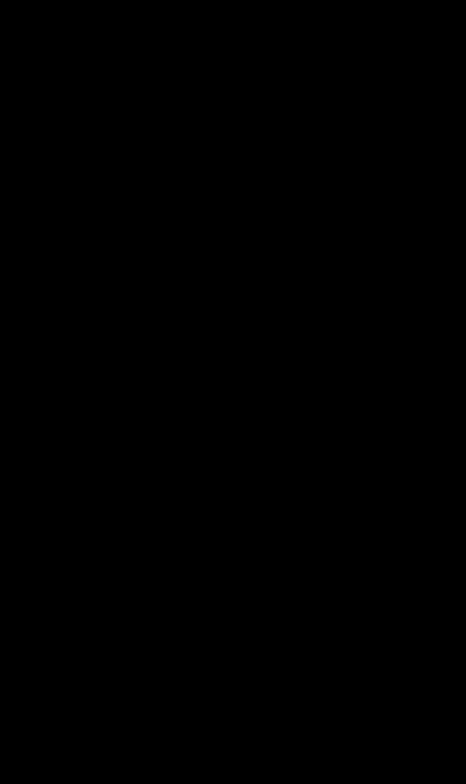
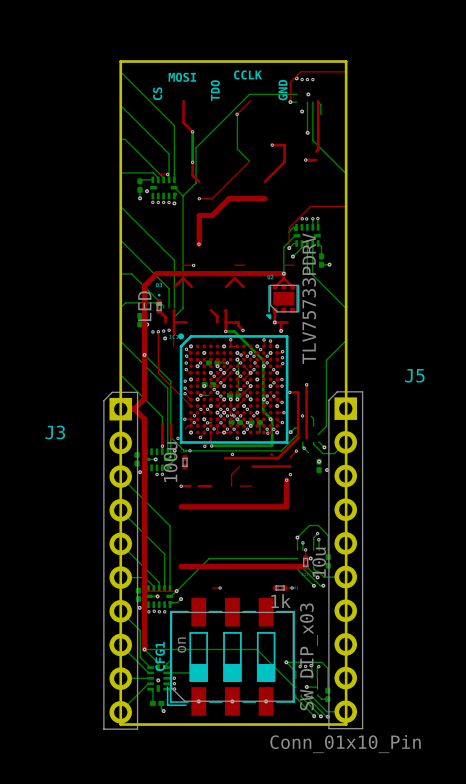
board edge: none -> (120, 61) (346, 61) (346, 724) (120, 724) (120, 61)
bottom track: none -> (120, 71) (174, 125) (174, 179)
top track: none -> (345, 71) (300, 71) (290, 82) (290, 102)
text: none -> CCLK (247, 74)
text: none -> MOSI (182, 77)
via: none -> (296, 78)
via: none -> (302, 79)
via: none -> (307, 79)
via: none -> (312, 79)
text: none -> TDO (215, 90)
text: none -> GND (282, 90)
text: none -> CS (157, 93)
bottom track: none -> (297, 94) (249, 94) (196, 147) (196, 183) (183, 196)
via: none -> (308, 94)
top track: none -> (183, 101) (183, 122) (192, 131)
top track: none -> (250, 101) (237, 114)
top track: none -> (318, 101) (318, 149) (316, 151)
bottom track: none -> (290, 102) (296, 102)
via: none -> (290, 102)
bottom track: none -> (307, 102) (307, 132)
bottom track: none -> (312, 102) (312, 140) (345, 172)
bottom track: none -> (318, 102) (320, 104) (320, 114)
bottom track: none -> (120, 105) (169, 153) (169, 179)
via: none -> (302, 111)
bottom track: none -> (237, 114) (237, 149) (249, 161)
via: none -> (237, 114)
bottom track: none -> (192, 131) (192, 162)
via: none -> (192, 131)
via: none -> (307, 132)
bottom track: none -> (120, 139) (124, 139) (163, 179)
top track: none -> (272, 145) (284, 145) (284, 162) (264, 181)
via: none -> (272, 145)
top track: none -> (305, 160) (316, 160)
via: none -> (305, 160)
top track: none -> (249, 161) (212, 198) (199, 198)
top track: none -> (192, 162) (192, 175) (199, 181)
via: none -> (192, 162)
bottom track: none -> (120, 172) (153, 172) (158, 179)
top track: none -> (158, 174) (167, 174)
via: none -> (167, 174)
bottom track: none -> (152, 179) (139, 181)
part: none -> (139, 185)
part: none -> (163, 187)
bottom track: none -> (174, 187) (183, 196)
bottom track: none -> (139, 189) (139, 198)
via: none -> (146, 191)
bottom track: none -> (183, 196) (183, 308) (174, 315)
via: none -> (140, 198)
via: none -> (199, 198)
top track: none -> (264, 198) (229, 198) (212, 215) (199, 215) (198, 244)
via: none -> (152, 202)
via: none -> (158, 202)
via: none -> (163, 202)
via: none -> (168, 202)
via: none -> (174, 203)
bottom track: none -> (120, 206) (174, 260) (174, 307)
top track: none -> (345, 206) (310, 206) (289, 227) (289, 248)
via: none -> (302, 218)
via: none -> (306, 218)
bottom track: none -> (312, 218) (312, 227)
via: none -> (312, 218)
bottom track: none -> (317, 218) (318, 227)
via: none -> (317, 218)
bottom track: none -> (296, 227) (293, 227) (288, 232)
bottom track: none -> (296, 235) (283, 247) (283, 273)
part: none -> (307, 235)
bottom track: none -> (120, 240) (169, 288) (169, 307)
bottom track: none -> (296, 243) (289, 248)
bottom track: none -> (301, 243) (301, 247) (292, 256)
bottom track: none -> (307, 243) (307, 274)
bottom track: none -> (312, 243) (312, 275) (345, 307)
bottom track: none -> (318, 243) (321, 246) (321, 256)
via: none -> (198, 244)
via: none -> (289, 248)
via: none -> (292, 256)
part: none -> (321, 260)
bottom track: none -> (321, 264) (329, 264)
via: none -> (329, 264)
top track: none -> (183, 265) (193, 265)
via: none -> (193, 265)
top track: none -> (234, 265) (245, 265)
top track: none -> (283, 265) (294, 265)
via: none -> (283, 273)
bottom track: none -> (120, 274) (131, 274) (163, 307)
top track: none -> (283, 278) (283, 273) (156, 273) (144, 286) (144, 398) (134, 409)
top track: none -> (283, 278) (292, 286)
top track: none -> (283, 278) (275, 286)
top track: none -> (174, 286) (183, 278) (191, 286)
top track: none -> (226, 286) (234, 278) (243, 286)
part: none -> TLV75733PDRV (282, 301)
part: none -> LED (159, 303)
bottom track: none -> (120, 307) (125, 302) (155, 302) (158, 307)
top track: none -> (159, 310) (165, 317) (165, 322)
top track: none -> (174, 310) (173, 346)
top track: none -> (210, 310) (217, 316) (217, 322)
top track: none -> (226, 310) (225, 331)
top track: none -> (275, 310) (274, 322) (287, 322)
part: none -> (139, 320)
top track: none -> (174, 322) (186, 322)
top track: none -> (225, 322) (238, 322) (238, 325) (243, 330)
via: none -> (274, 322)
top track: none -> (281, 322) (281, 330)
via: none -> (147, 324)
via: none -> (169, 330)
via: none -> (243, 330)
via: none -> (281, 330)
via: none -> (152, 331)
top track: none -> (158, 331) (158, 373) (191, 406)
via: none -> (158, 331)
via: none -> (163, 331)
bottom track: none -> (225, 331) (234, 331) (263, 360) (263, 411) (272, 419) (272, 445) (211, 446)
via: none -> (225, 331)
via: none -> (165, 338)
top track: none -> (230, 339) (230, 346) (237, 346)
via: none -> (230, 339)
top track: none -> (264, 339) (264, 346)
via: none -> (264, 339)
bottom track: none -> (120, 341) (167, 388) (167, 451)
top track: none -> (270, 341) (270, 346)
via: none -> (270, 341)
bottom track: none -> (345, 341) (326, 360) (326, 426) (318, 434)
via: none -> (191, 346)
via: none -> (224, 346)
via: none -> (257, 346)
via: none -> (277, 346)
top track: none -> (186, 349) (191, 352)
via: none -> (186, 349)
via: none -> (260, 349)
top track: none -> (282, 351) (277, 352)
via: none -> (282, 351)
via: none -> (204, 352)
via: none -> (237, 352)
via: none -> (250, 352)
via: none -> (270, 352)
bottom track: none -> (144, 354) (170, 381) (170, 456) (167, 459)
via: none -> (144, 354)
via: none -> (241, 355)
top track: none -> (186, 356) (191, 359)
via: none -> (186, 356)
via: none -> (247, 356)
via: none -> (253, 356)
via: none -> (267, 356)
bottom track: none -> (238, 357) (238, 395)
via: none -> (282, 357)
top track: none -> (224, 359) (217, 366)
via: none -> (237, 359)
via: none -> (200, 362)
part: none -> (213, 362)
bottom track: none -> (217, 362) (227, 362)
via: none -> (227, 362)
via: none -> (240, 362)
via: none -> (254, 362)
via: none -> (267, 362)
via: none -> (186, 363)
top track: none -> (282, 363) (277, 366)
via: none -> (282, 363)
via: none -> (197, 366)
via: none -> (217, 366)
top track: none -> (230, 366) (217, 379)
top track: none -> (244, 366) (250, 372) (244, 379)
via: none -> (263, 366)
top track: none -> (186, 369) (191, 372)
via: none -> (186, 369)
via: none -> (220, 369)
via: none -> (234, 369)
via: none -> (253, 369)
via: none -> (273, 369)
via: none -> (210, 372)
via: none -> (224, 372)
top track: none -> (230, 372) (220, 382)
via: none -> (237, 372)
via: none -> (250, 372)
via: none -> (277, 372)
bottom track: none -> (120, 375) (162, 416) (162, 451)
via: none -> (214, 376)
via: none -> (240, 376)
via: none -> (191, 379)
via: none -> (257, 379)
top track: none -> (277, 379) (281, 379)
via: none -> (281, 379)
via: none -> (185, 381)
via: none -> (220, 382)
via: none -> (247, 382)
via: none -> (273, 382)
part: none -> (208, 384)
top track: none -> (306, 384) (306, 438)
via: none -> (306, 384)
via: none -> (204, 386)
top track: none -> (217, 386) (214, 389)
via: none -> (224, 386)
top track: none -> (250, 386) (237, 399)
via: none -> (250, 386)
via: none -> (270, 386)
top track: none -> (277, 386) (282, 386)
via: none -> (282, 386)
top track: none -> (185, 388) (191, 392)
via: none -> (185, 388)
part: none -> (233, 388)
via: none -> (214, 389)
via: none -> (240, 389)
via: none -> (217, 392)
top track: none -> (289, 392) (298, 392) (298, 438) (278, 458) (225, 458)
via: none -> (289, 392)
top track: none -> (185, 393) (190, 399)
via: none -> (185, 393)
bottom track: none -> (200, 395) (208, 395)
via: none -> (200, 395)
part: none -> (234, 395)
via: none -> (220, 396)
via: none -> (247, 396)
via: none -> (267, 396)
via: none -> (273, 396)
via: none -> (197, 399)
top track: none -> (224, 399) (217, 406)
via: none -> (224, 399)
top track: none -> (230, 399) (230, 406)
via: none -> (230, 399)
via: none -> (237, 399)
top track: none -> (244, 399) (234, 409)
via: none -> (250, 399)
via: none -> (263, 399)
top track: none -> (277, 399) (282, 402)
via: none -> (267, 402)
via: none -> (282, 402)
via: none -> (210, 406)
via: none -> (244, 406)
via: none -> (277, 406)
top track: none -> (120, 409) (134, 409) (144, 419) (144, 649)
via: none -> (200, 409)
top track: none -> (207, 409) (210, 412)
via: none -> (207, 409)
via: none -> (220, 409)
top track: none -> (227, 409) (230, 412)
via: none -> (227, 409)
via: none -> (234, 409)
via: none -> (247, 409)
via: none -> (217, 412)
via: none -> (224, 412)
top track: none -> (243, 412) (240, 415)
via: none -> (257, 412)
top track: none -> (277, 412) (283, 412)
via: none -> (283, 412)
via: none -> (231, 414)
via: none -> (194, 415)
via: none -> (220, 415)
via: none -> (227, 415)
via: none -> (234, 415)
via: none -> (240, 415)
via: none -> (253, 415)
via: none -> (302, 415)
bottom track: none -> (311, 416) (313, 418) (313, 426)
top track: none -> (184, 419) (191, 419)
via: none -> (184, 419)
via: none -> (204, 419)
via: none -> (237, 419)
via: none -> (270, 419)
top track: none -> (277, 419) (282, 422)
via: none -> (194, 422)
via: none -> (207, 422)
bottom track: none -> (211, 422) (207, 422)
via: none -> (220, 422)
part: none -> (235, 422)
via: none -> (247, 422)
part: none -> (255, 422)
bottom track: none -> (259, 422) (259, 433)
via: none -> (282, 422)
top track: none -> (162, 424) (162, 446)
top track: none -> (171, 424) (171, 438)
top track: none -> (191, 425) (185, 428)
top track: none -> (217, 425) (217, 432) (230, 432)
via: none -> (250, 425)
via: none -> (214, 428)
bottom track: none -> (296, 428) (290, 432)
via: none -> (207, 429)
via: none -> (227, 429)
via: none -> (234, 429)
via: none -> (247, 429)
via: none -> (267, 429)
via: none -> (273, 429)
via: none -> (191, 432)
top track: none -> (204, 432) (200, 437)
top track: none -> (210, 432) (210, 440) (204, 446)
via: none -> (224, 432)
via: none -> (244, 432)
via: none -> (277, 432)
via: none -> (290, 432)
via: none -> (267, 433)
bottom track: none -> (297, 434) (281, 450) (184, 450) (170, 437)
via: none -> (200, 437)
via: none -> (178, 438)
via: none -> (237, 438)
bottom track: none -> (302, 442) (302, 446) (308, 452)
bottom track: none -> (313, 442) (322, 453) (334, 453) (345, 442)
bottom track: none -> (318, 442) (324, 447)
via: none -> (162, 446)
via: none -> (204, 446)
via: none -> (211, 446)
via: none -> (324, 447)
via: none -> (304, 448)
bottom track: none -> (174, 450) (174, 459) (168, 465)
via: none -> (174, 450)
via: none -> (190, 450)
top track: none -> (296, 451) (290, 458)
via: none -> (296, 451)
via: none -> (232, 454)
top track: none -> (271, 454) (271, 454)
part: none -> (137, 459)
bottom track: none -> (146, 459) (155, 459)
via: none -> (155, 459)
part: none -> (157, 459)
via: none -> (319, 461)
part: none -> 100u (185, 462)
part: none -> (319, 465)
top track: none -> (239, 466) (231, 474) (231, 486)
top track: none -> (252, 466) (290, 466)
via: none -> (327, 470)
via: none -> (140, 472)
via: none -> (157, 474)
via: none -> (162, 474)
via: none -> (290, 474)
bottom track: none -> (120, 476) (169, 525) (169, 588)
top track: none -> (286, 480) (286, 506) (181, 506)
via: none -> (286, 480)
top track: none -> (181, 486) (190, 486)
via: none -> (181, 486)
top track: none -> (198, 486) (210, 486)
top track: none -> (240, 486) (251, 486)
bottom track: none -> (120, 510) (164, 554) (164, 588)
bottom track: none -> (317, 533) (313, 537) (313, 550)
via: none -> (317, 533)
via: none -> (297, 537)
bottom track: none -> (318, 539) (319, 550)
via: none -> (318, 539)
bottom track: none -> (302, 542) (302, 550)
via: none -> (302, 542)
bottom track: none -> (120, 543) (159, 582) (159, 588)
top track: none -> (305, 549) (305, 558)
via: none -> (305, 549)
bottom track: none -> (297, 550) (297, 537) (309, 525) (318, 525) (328, 535) (328, 557)
bottom track: none -> (297, 558) (209, 558) (169, 596)
via: none -> (310, 558)
J3: none -> (120, 560)
J5: none -> Conn_01x10_Pin (345, 560)
part: none -> (328, 561)
part: none -> 10u (305, 562)
top track: none -> (181, 566) (305, 566)
bottom track: none -> (297, 566) (297, 569) (313, 585)
bottom track: none -> (302, 566) (320, 585) (323, 585)
bottom track: none -> (308, 566) (317, 577)
bottom track: none -> (313, 566) (313, 568) (324, 577) (345, 577)
bottom track: none -> (120, 577) (144, 577) (153, 588)
via: none -> (317, 577)
via: none -> (313, 585)
via: none -> (323, 585)
top track: none -> (212, 588) (220, 588)
via: none -> (220, 588)
part: none -> 1k (280, 588)
top track: none -> (284, 588) (292, 588)
via: none -> (292, 588)
top track: none -> (144, 591) (176, 591)
via: none -> (176, 591)
part: none -> (138, 594)
bottom track: none -> (149, 596) (157, 596)
via: none -> (157, 596)
part: none -> (159, 596)
bottom track: none -> (181, 599) (177, 602) (170, 602)
via: none -> (181, 599)
via: none -> (139, 607)
bottom track: none -> (120, 611) (140, 630) (140, 657) (150, 667)
via: none -> (148, 611)
via: none -> (154, 611)
via: none -> (159, 611)
via: none -> (164, 611)
bottom track: none -> (120, 644) (150, 672)
via: none -> (144, 649)
CFG1: none -> SW_DIP_x03 (230, 656)
bottom track: none -> (170, 659) (166, 664) (166, 667)
via: none -> (286, 662)
bottom track: none -> (311, 665) (311, 678)
via: none -> (311, 665)
via: none -> (300, 666)
via: none -> (305, 666)
bottom track: none -> (318, 666) (317, 678)
via: none -> (318, 666)
bottom track: none -> (158, 667) (158, 663) (144, 649) (256, 649) (296, 687)
bottom track: none -> (198, 672) (166, 672)
bottom track: none -> (150, 678) (120, 678)
part: none -> (158, 678)
via: none -> (174, 678)
bottom track: none -> (295, 678) (295, 671) (286, 662) (321, 662) (327, 668) (327, 690)
via: none -> (158, 680)
bottom track: none -> (150, 683) (120, 712)
via: none -> (174, 683)
via: none -> (306, 686)
bottom track: none -> (306, 687) (316, 687)
via: none -> (174, 688)
bottom track: none -> (150, 689) (152, 691) (152, 703)
bottom track: none -> (295, 694) (295, 697) (314, 716)
bottom track: none -> (301, 694) (320, 716)
bottom track: none -> (306, 694) (327, 716)
bottom track: none -> (311, 694) (326, 711) (345, 711)
bottom track: none -> (317, 694) (321, 699) (327, 699)
part: none -> (327, 694)
via: none -> (198, 701)
via: none -> (232, 701)
via: none -> (266, 701)
part: none -> (157, 703)
bottom track: none -> (161, 703) (161, 708) (163, 711)
via: none -> (163, 711)
via: none -> (314, 716)
via: none -> (320, 716)
via: none -> (327, 716)

